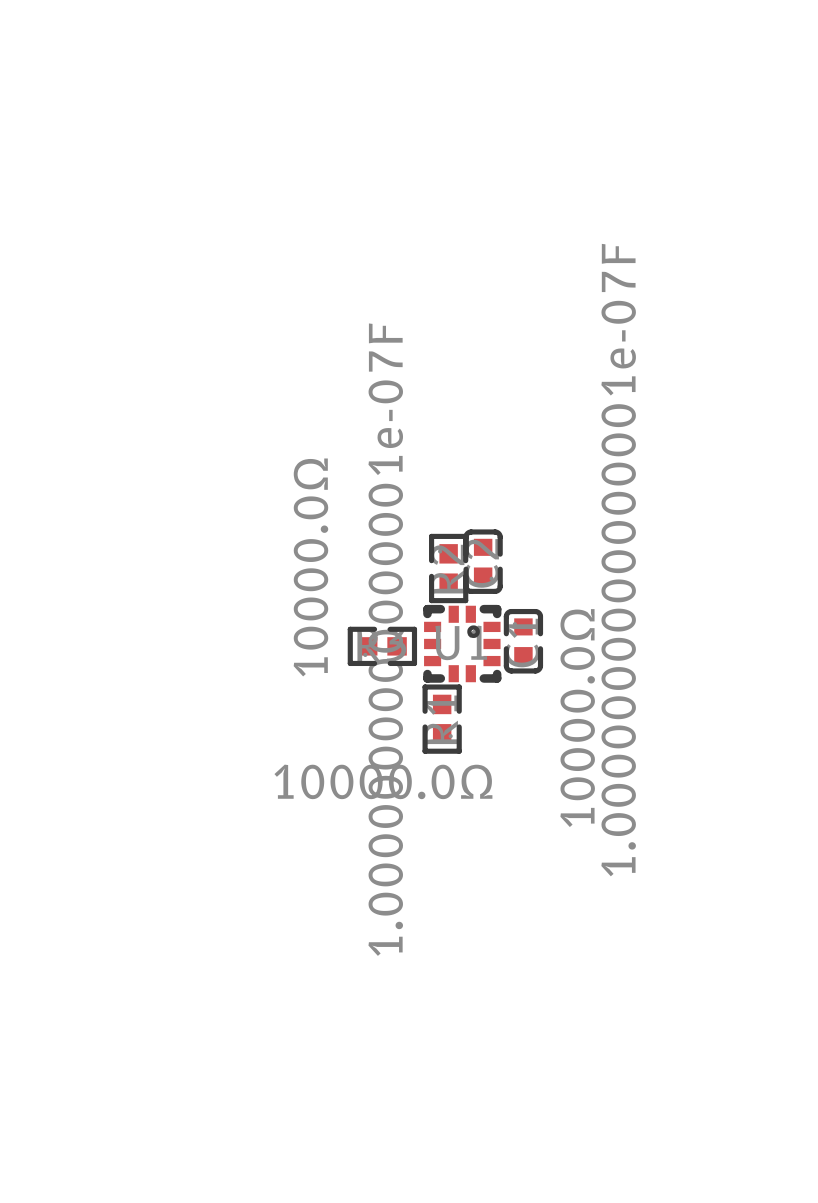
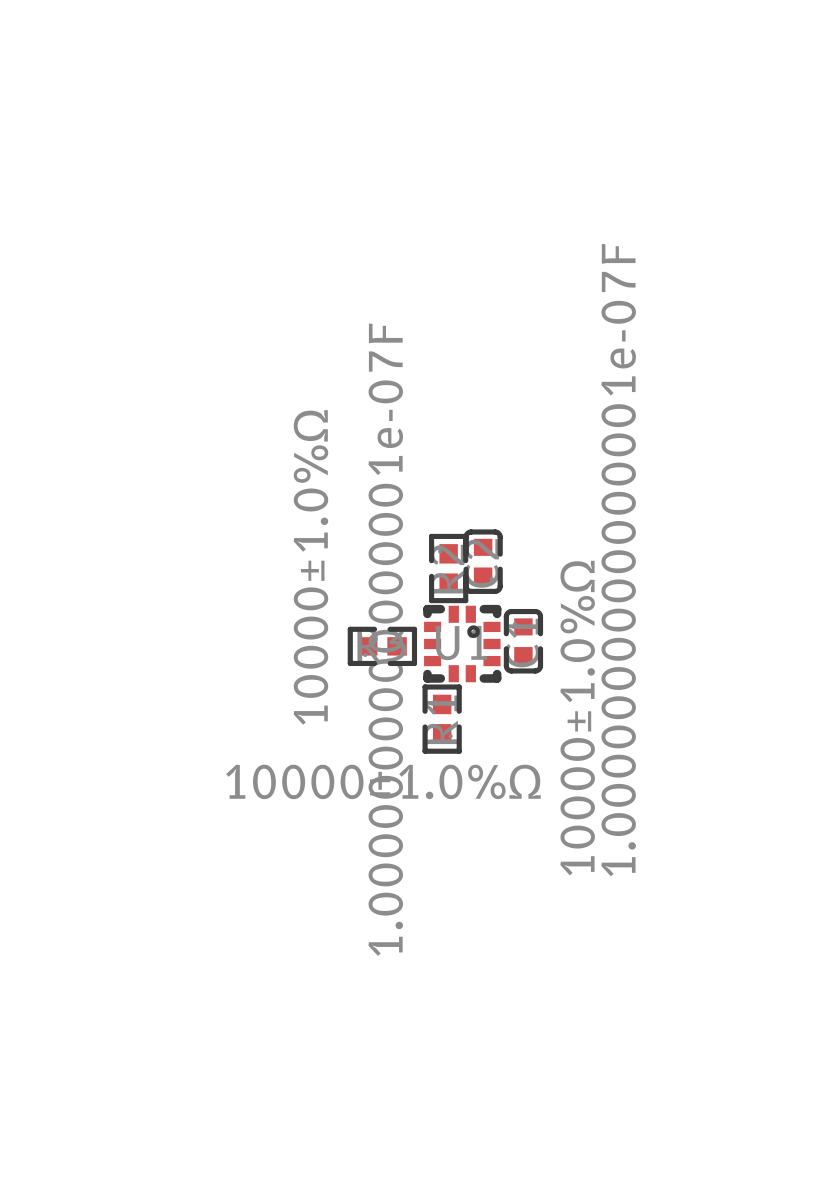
part value: 10000.0Ω (310, 567) -> 10000±1.0%Ω (310, 567)
part value: 10000.0Ω (577, 718) -> 10000±1.0%Ω (577, 718)
part value: 10000.0Ω (383, 781) -> 10000±1.0%Ω (383, 781)

